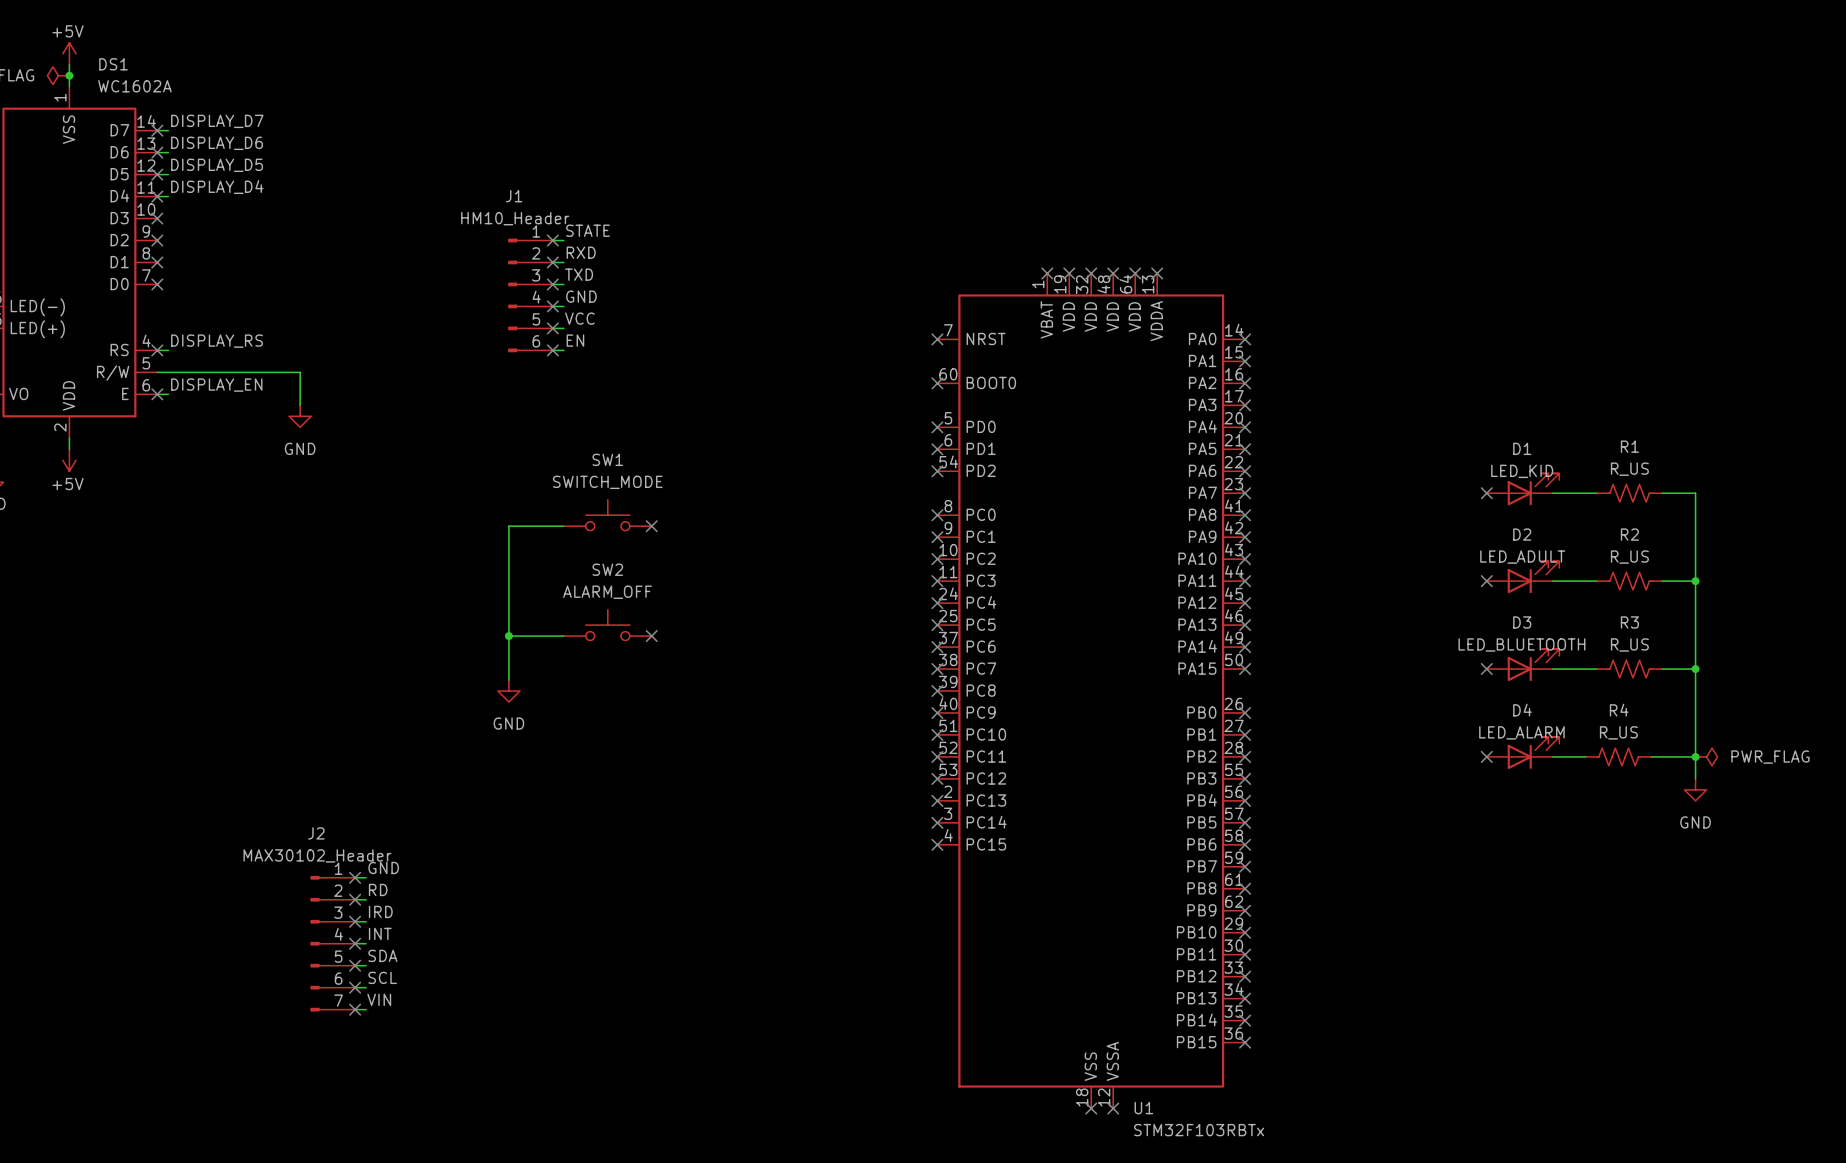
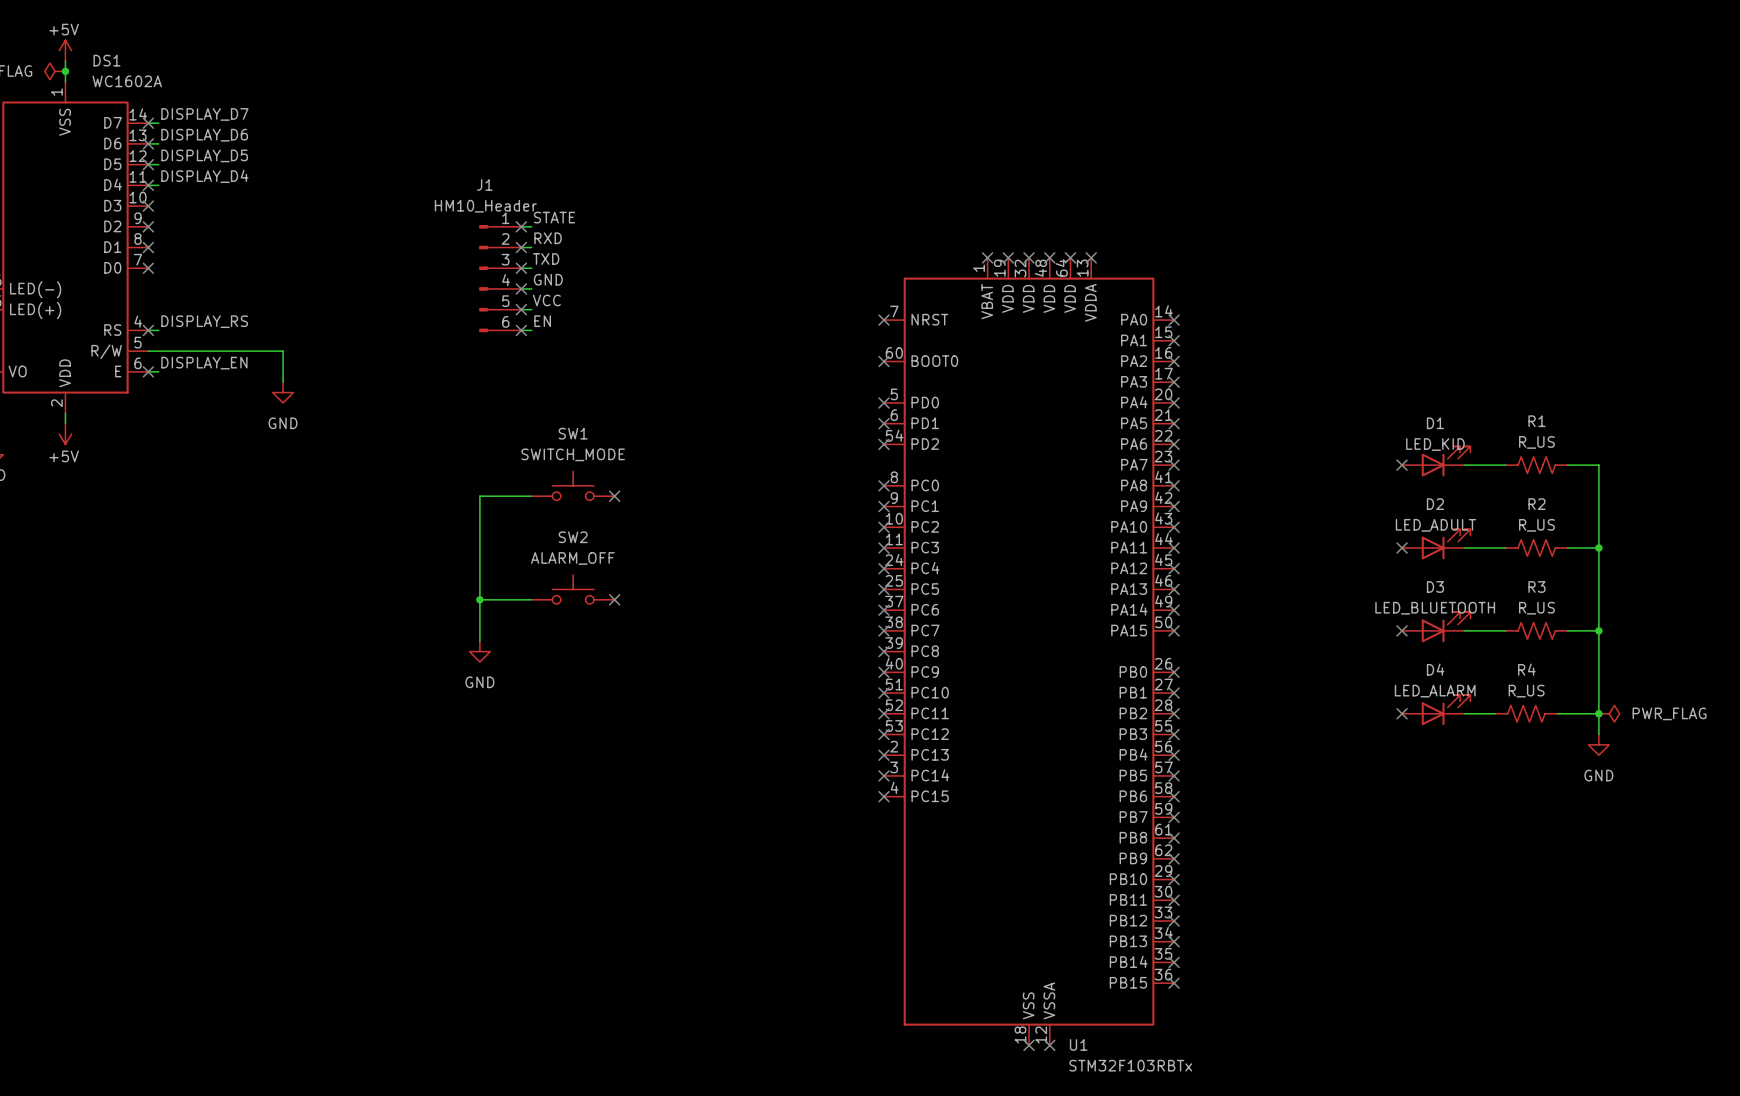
label: GND (383, 867) -> none
wire: (355, 877) (366, 877) -> none
no-connect mark: (355, 877) -> none
label: RD (378, 889) -> none
wire: (355, 899) (366, 899) -> none
no-connect mark: (355, 899) -> none
label: IRD (380, 911) -> none
wire: (355, 921) (366, 921) -> none
no-connect mark: (355, 921) -> none
label: INT (380, 933) -> none
J2: MAX30102_Header (332, 943) -> none
wire: (355, 943) (366, 943) -> none
no-connect mark: (355, 943) -> none
label: SDA (382, 955) -> none
wire: (355, 965) (366, 965) -> none
no-connect mark: (355, 965) -> none
label: SCL (382, 977) -> none
wire: (355, 987) (366, 987) -> none
no-connect mark: (355, 987) -> none
label: VIN (379, 999) -> none
wire: (355, 1009) (366, 1009) -> none
no-connect mark: (355, 1009) -> none

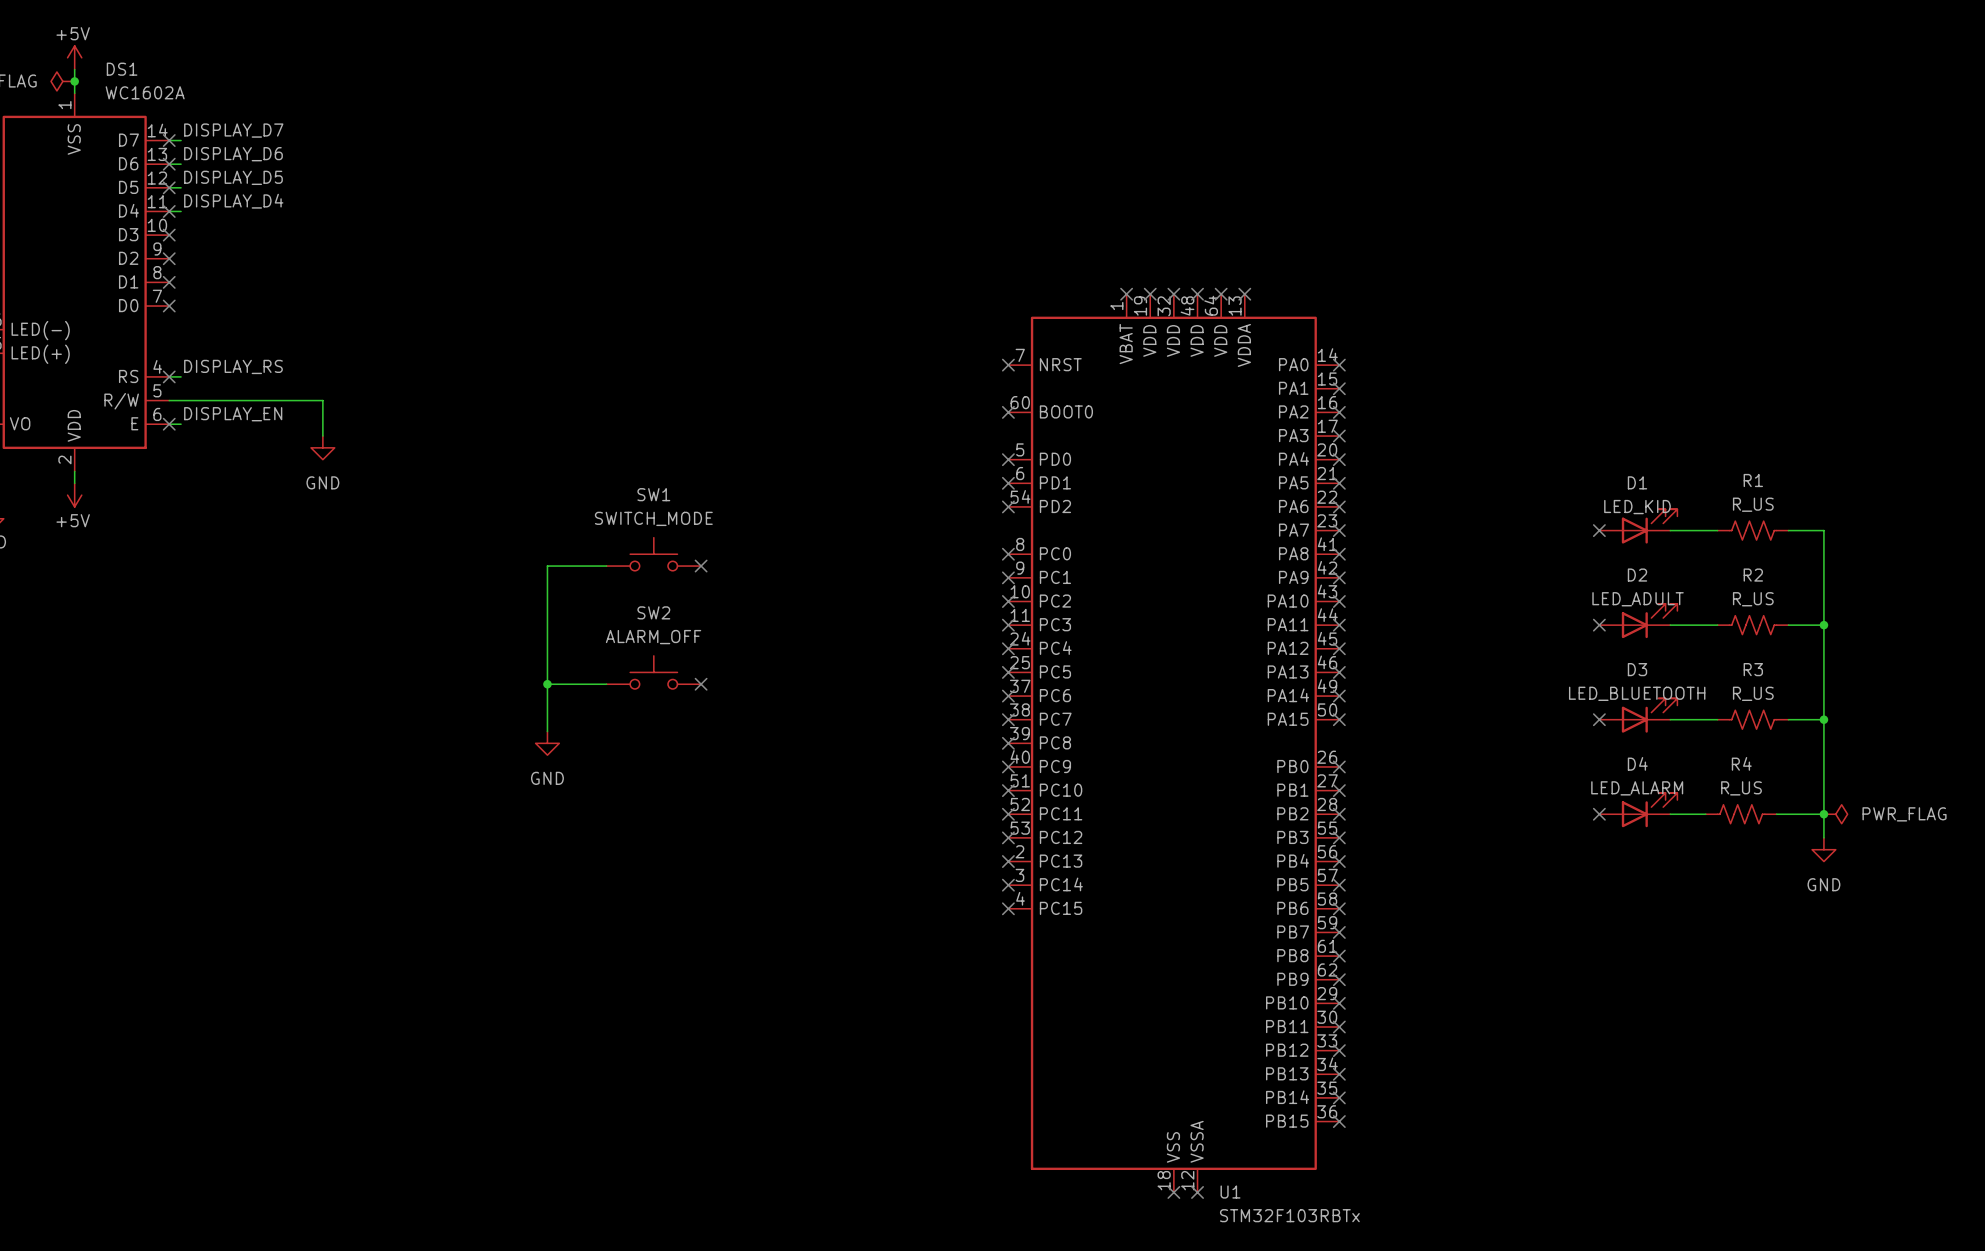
label: STATE (554, 217) -> none
wire: (521, 226) (531, 226) -> none
no-connect mark: (521, 226) -> none
label: RXD (548, 238) -> none
wire: (521, 247) (531, 247) -> none
no-connect mark: (521, 247) -> none
label: TXD (546, 259) -> none
wire: (521, 268) (531, 268) -> none
no-connect mark: (521, 268) -> none
J1: HM10_Header (500, 278) -> none
label: GND (548, 279) -> none
wire: (521, 288) (531, 288) -> none
no-connect mark: (521, 288) -> none
label: VCC (546, 300) -> none
wire: (521, 309) (531, 309) -> none
no-connect mark: (521, 309) -> none
label: EN (542, 321) -> none
wire: (521, 330) (531, 330) -> none
no-connect mark: (521, 330) -> none

